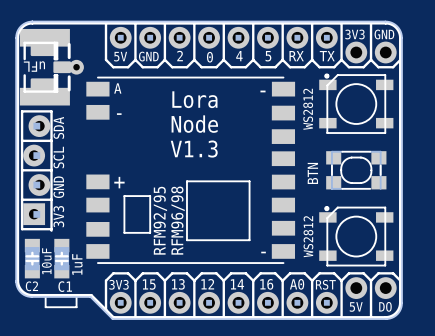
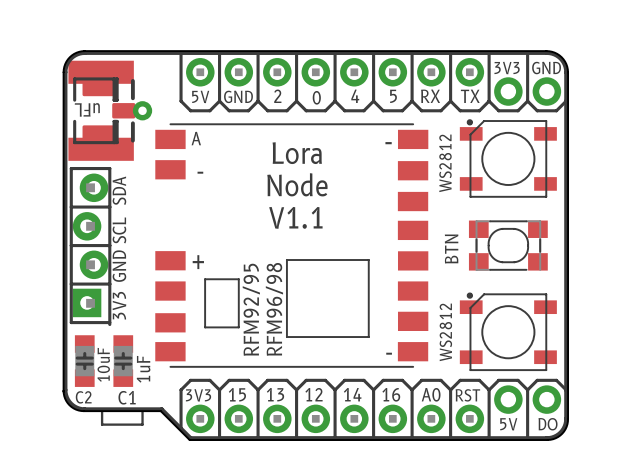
text: V1.3 (194, 149) -> V1.1 (295, 217)

